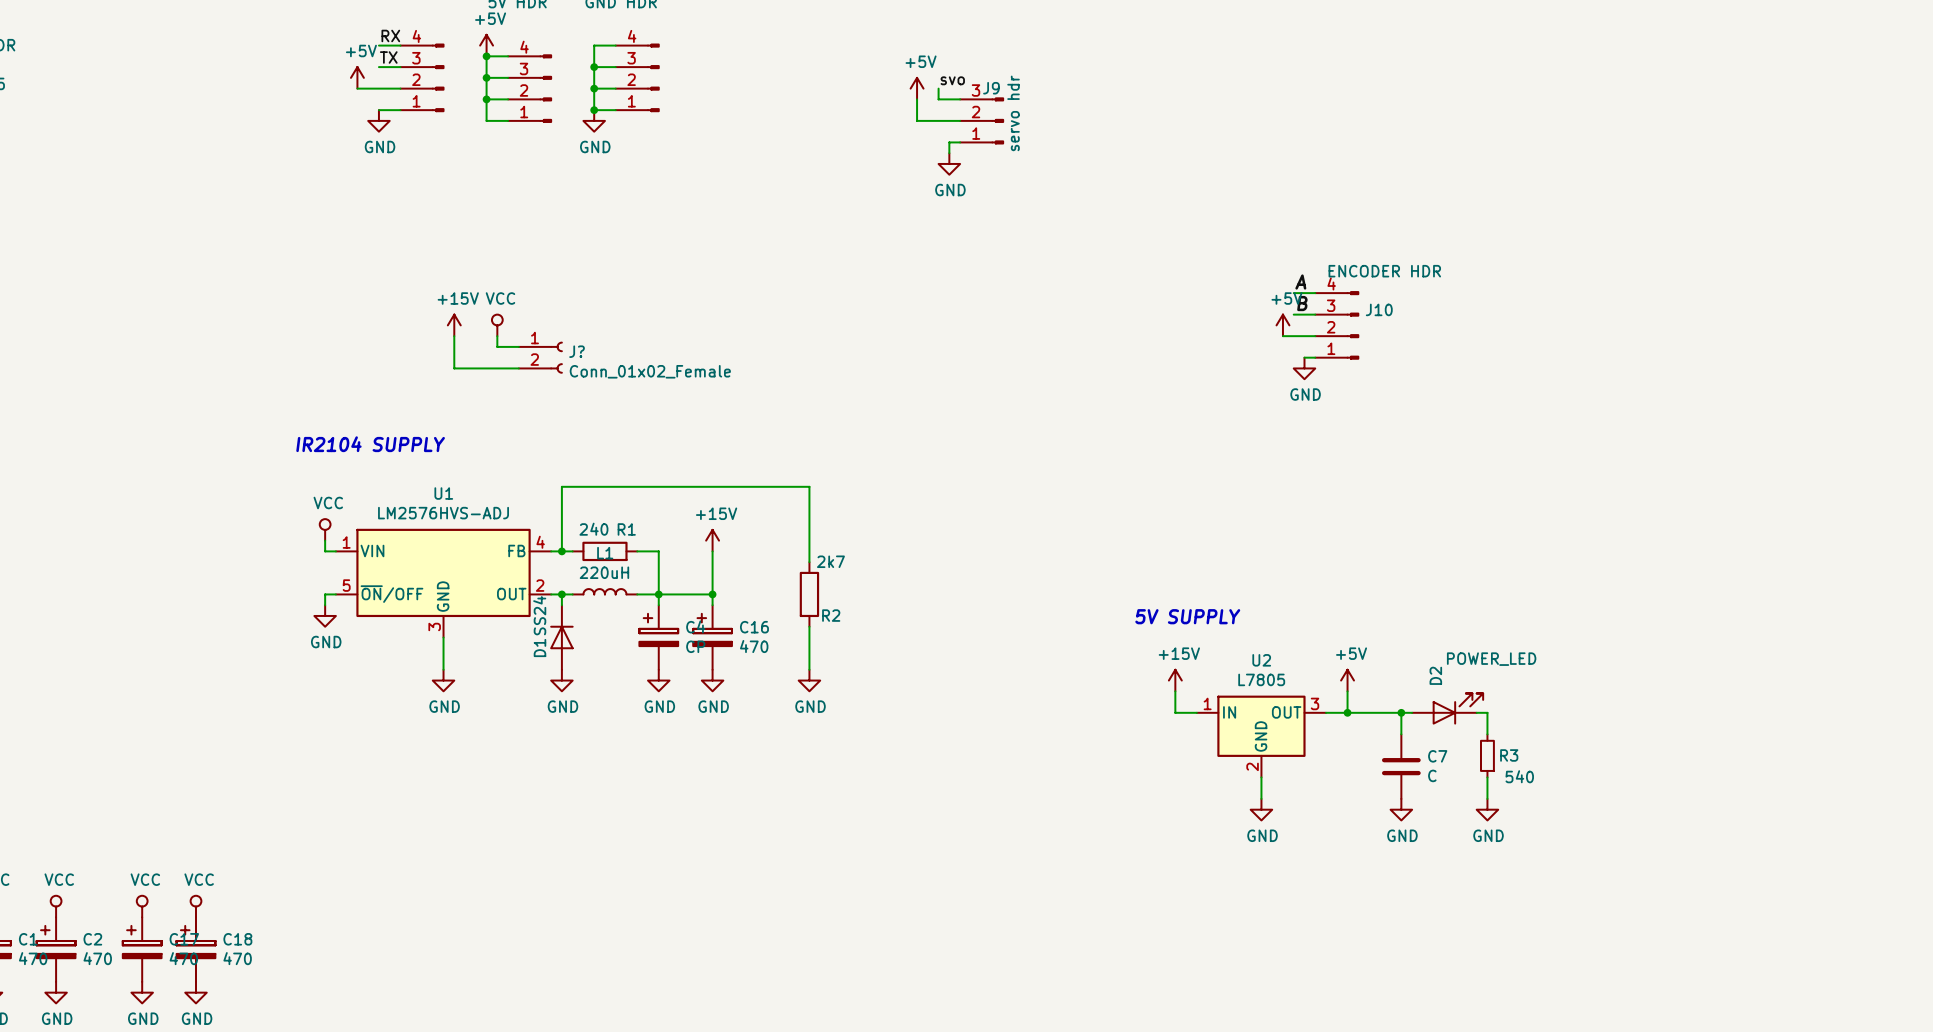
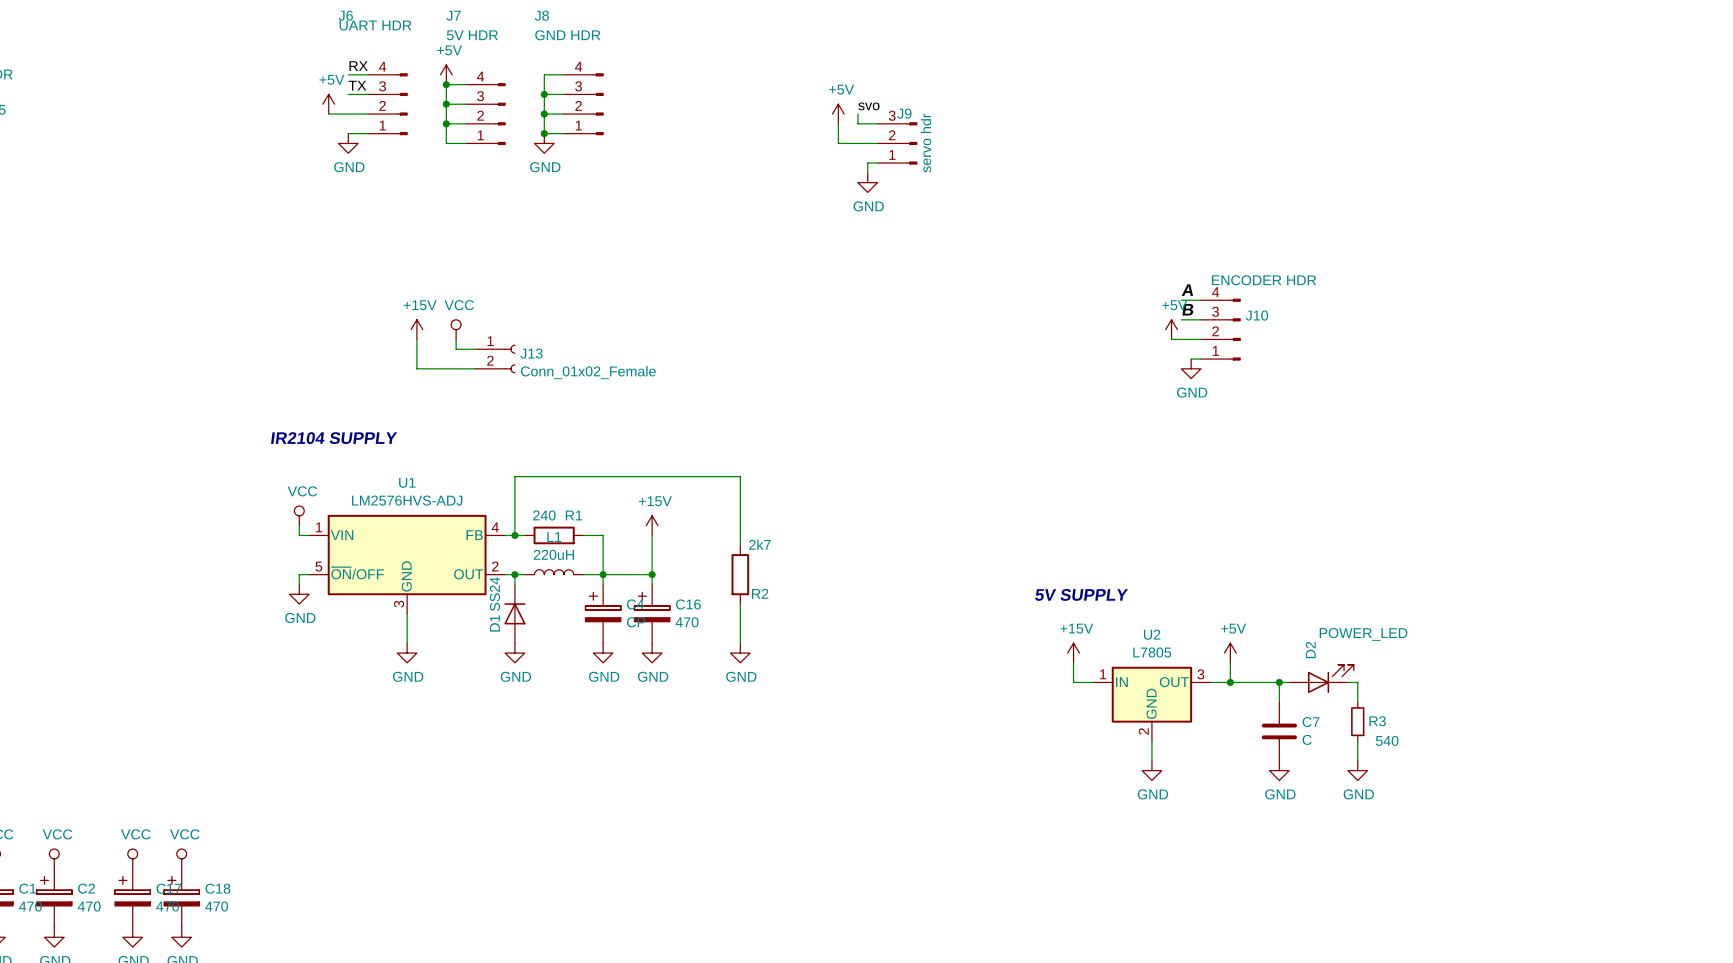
J? name: J? (577, 351) -> J13 (531, 353)

